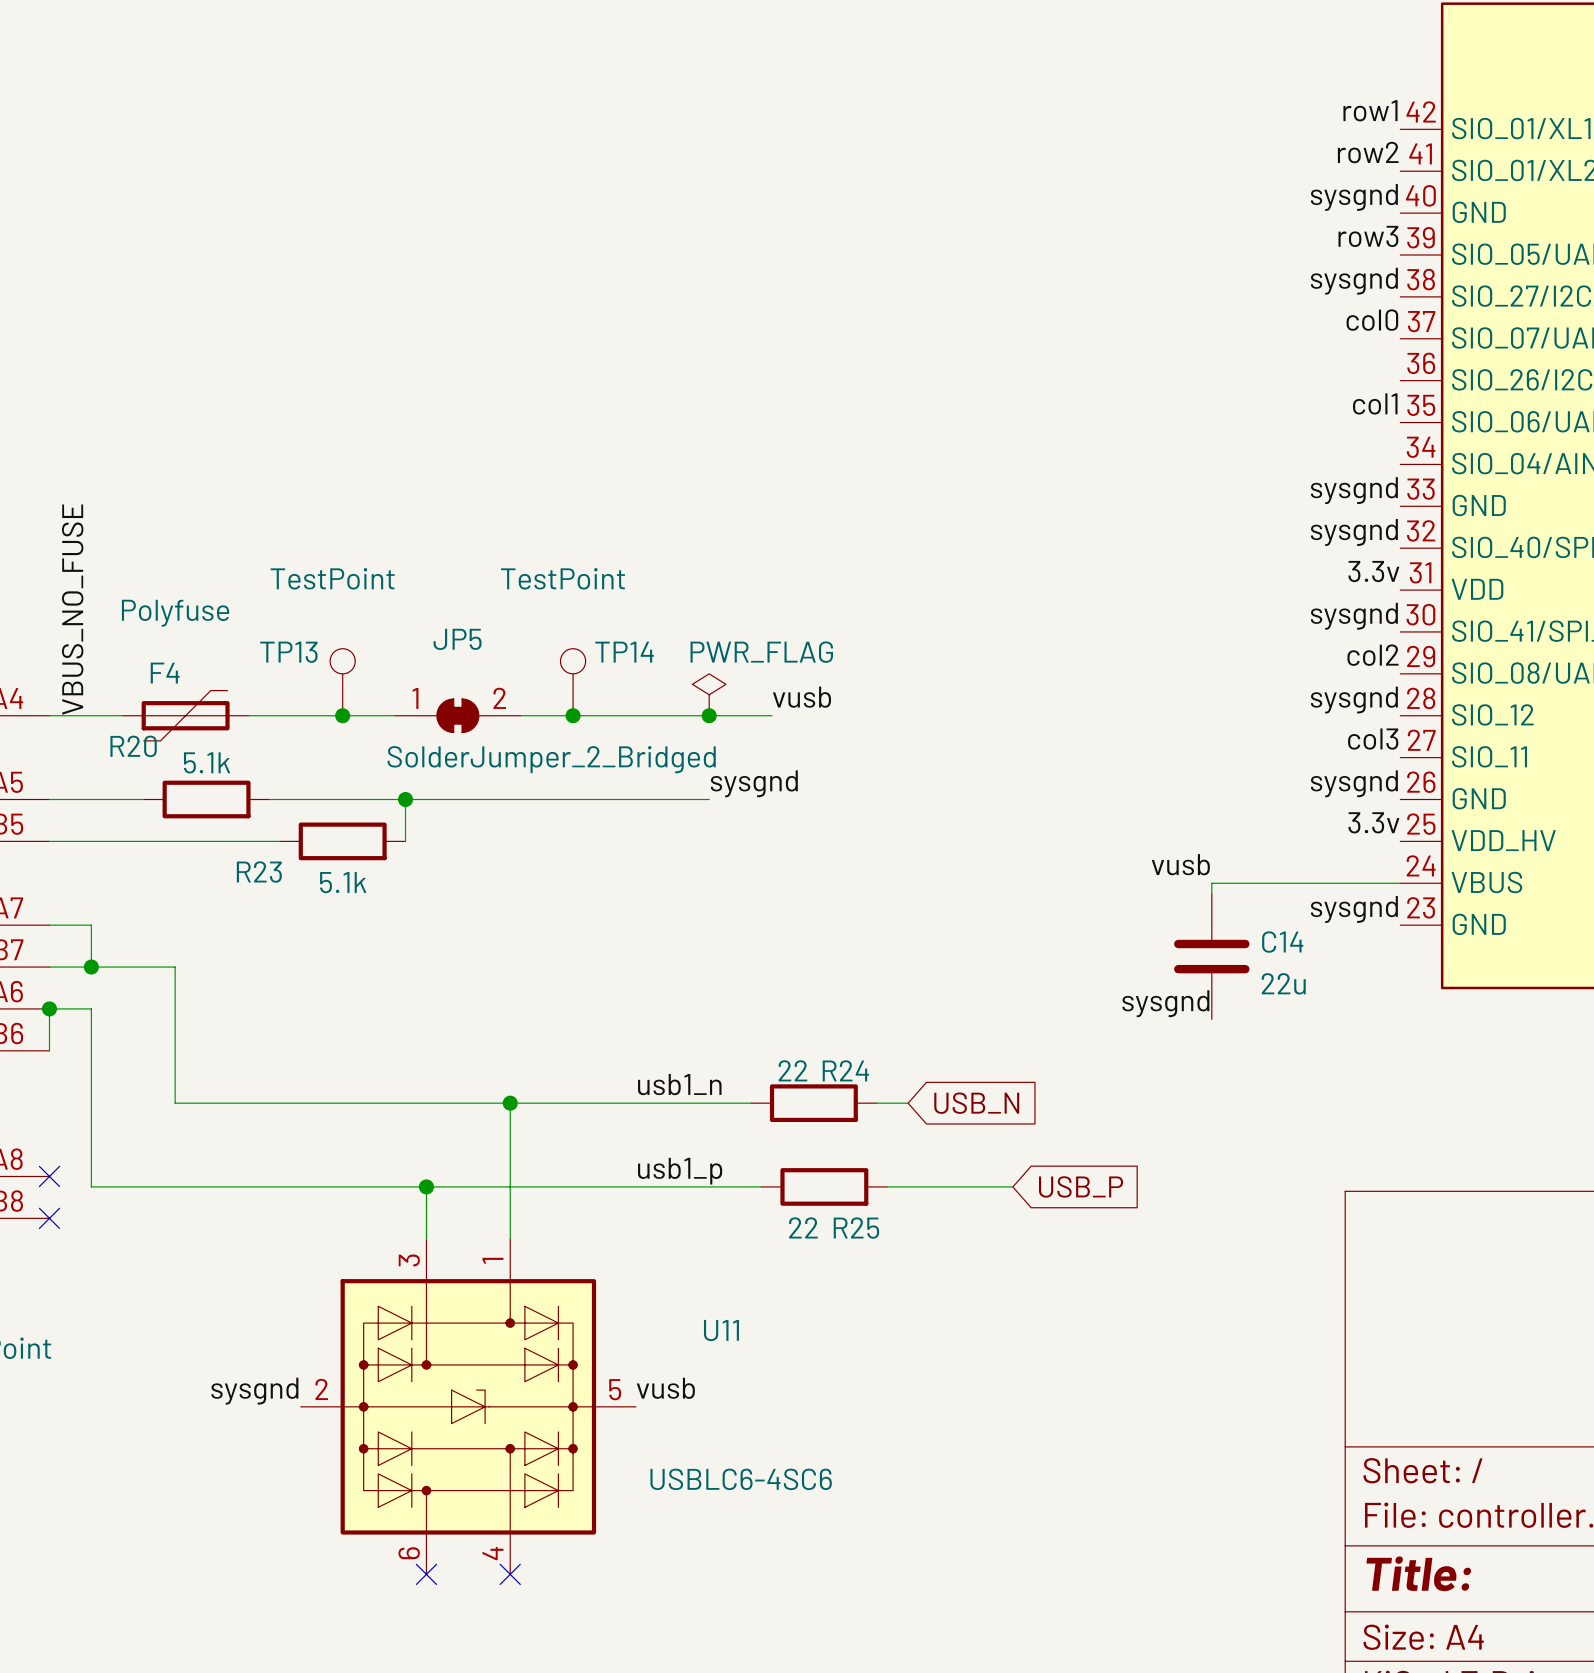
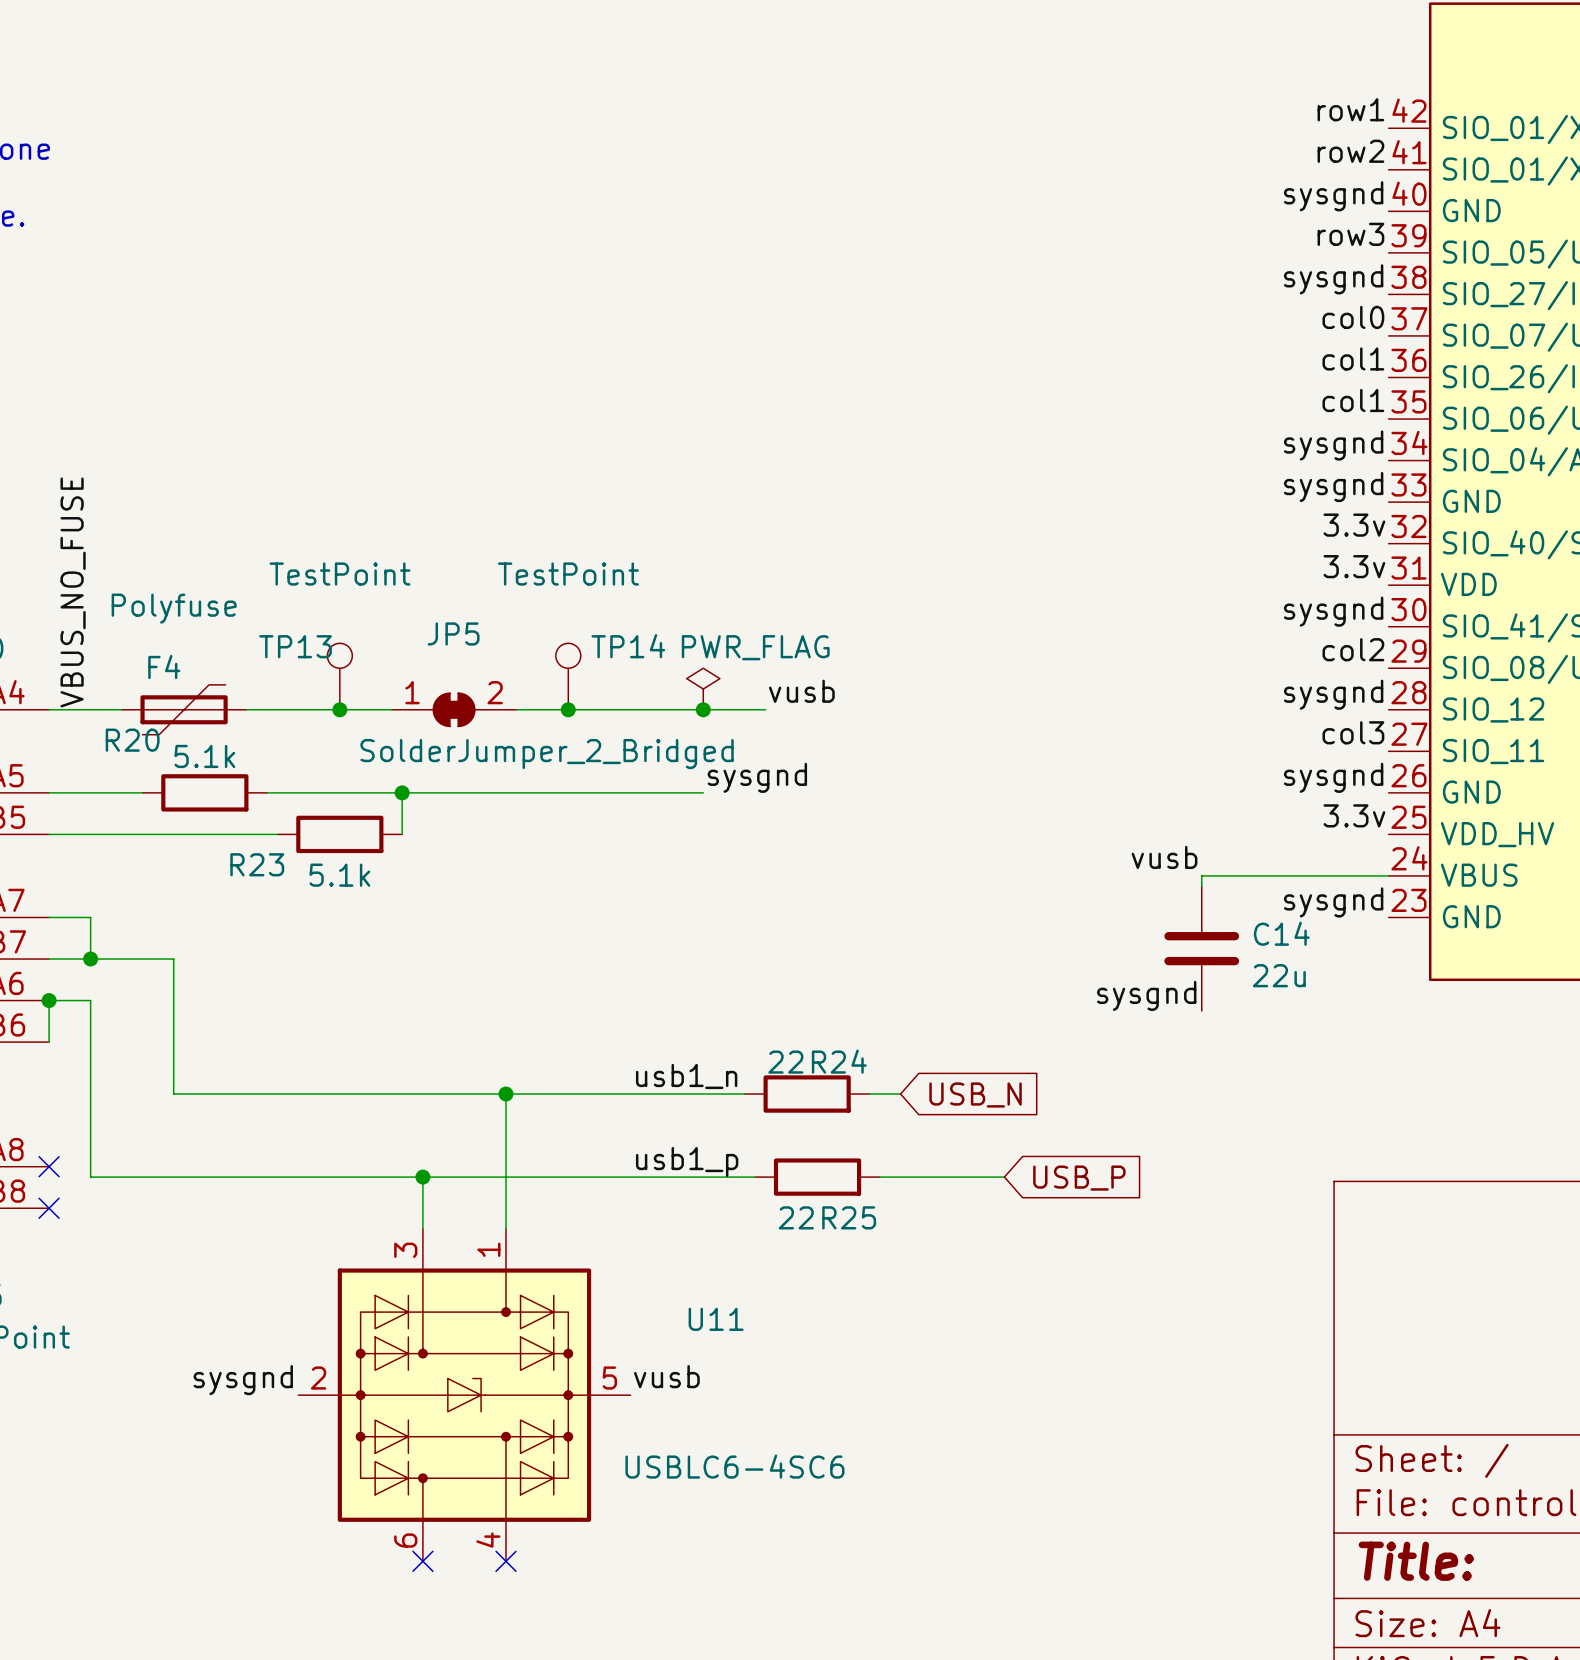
label: none -> col1 (1353, 358)
label: none -> sysgnd (1333, 445)
label: sysgnd (1354, 532) -> 3.3v (1354, 525)

